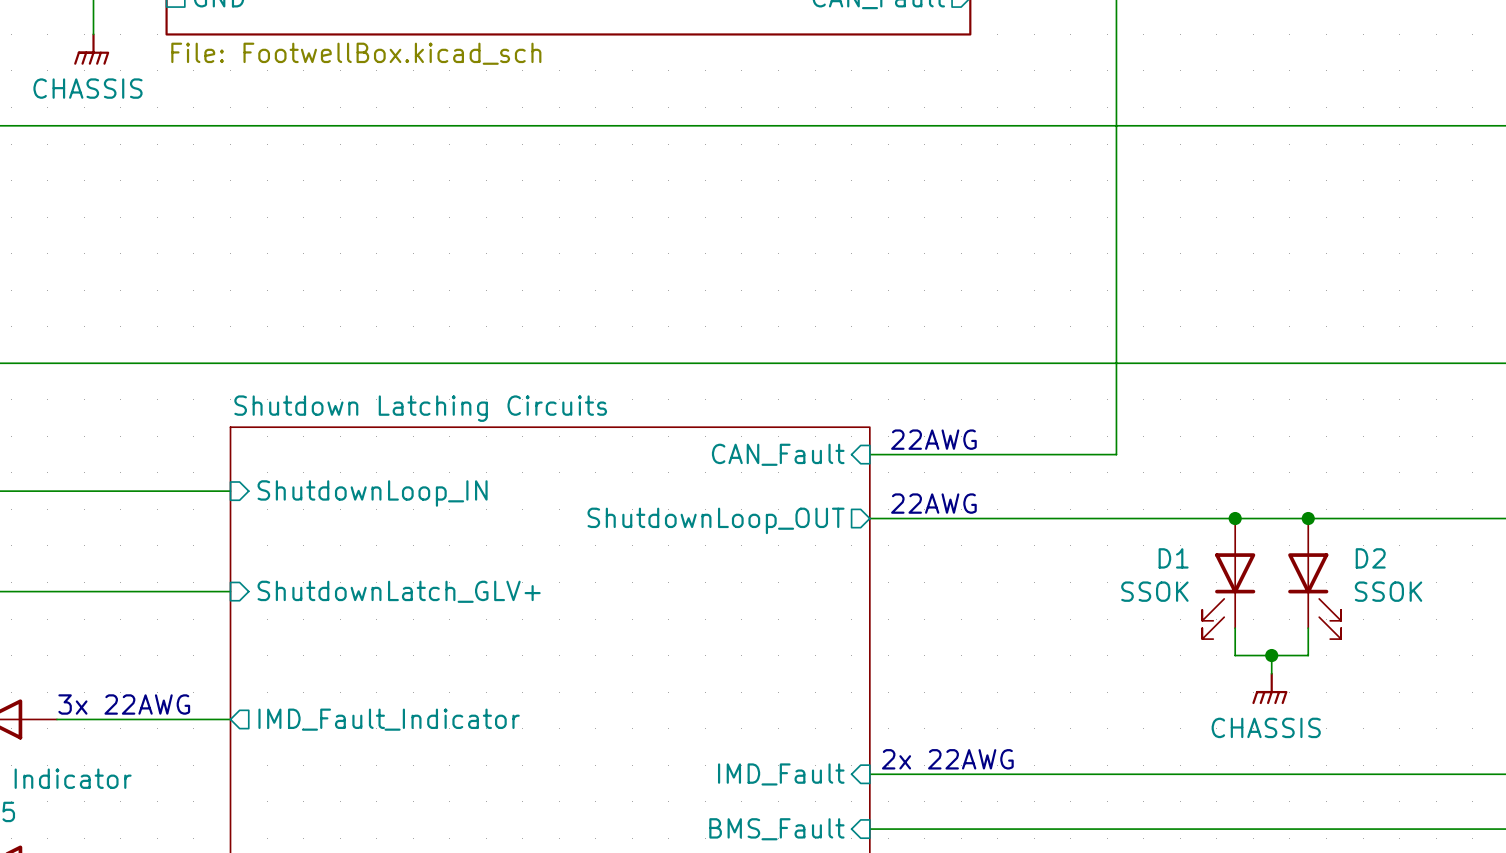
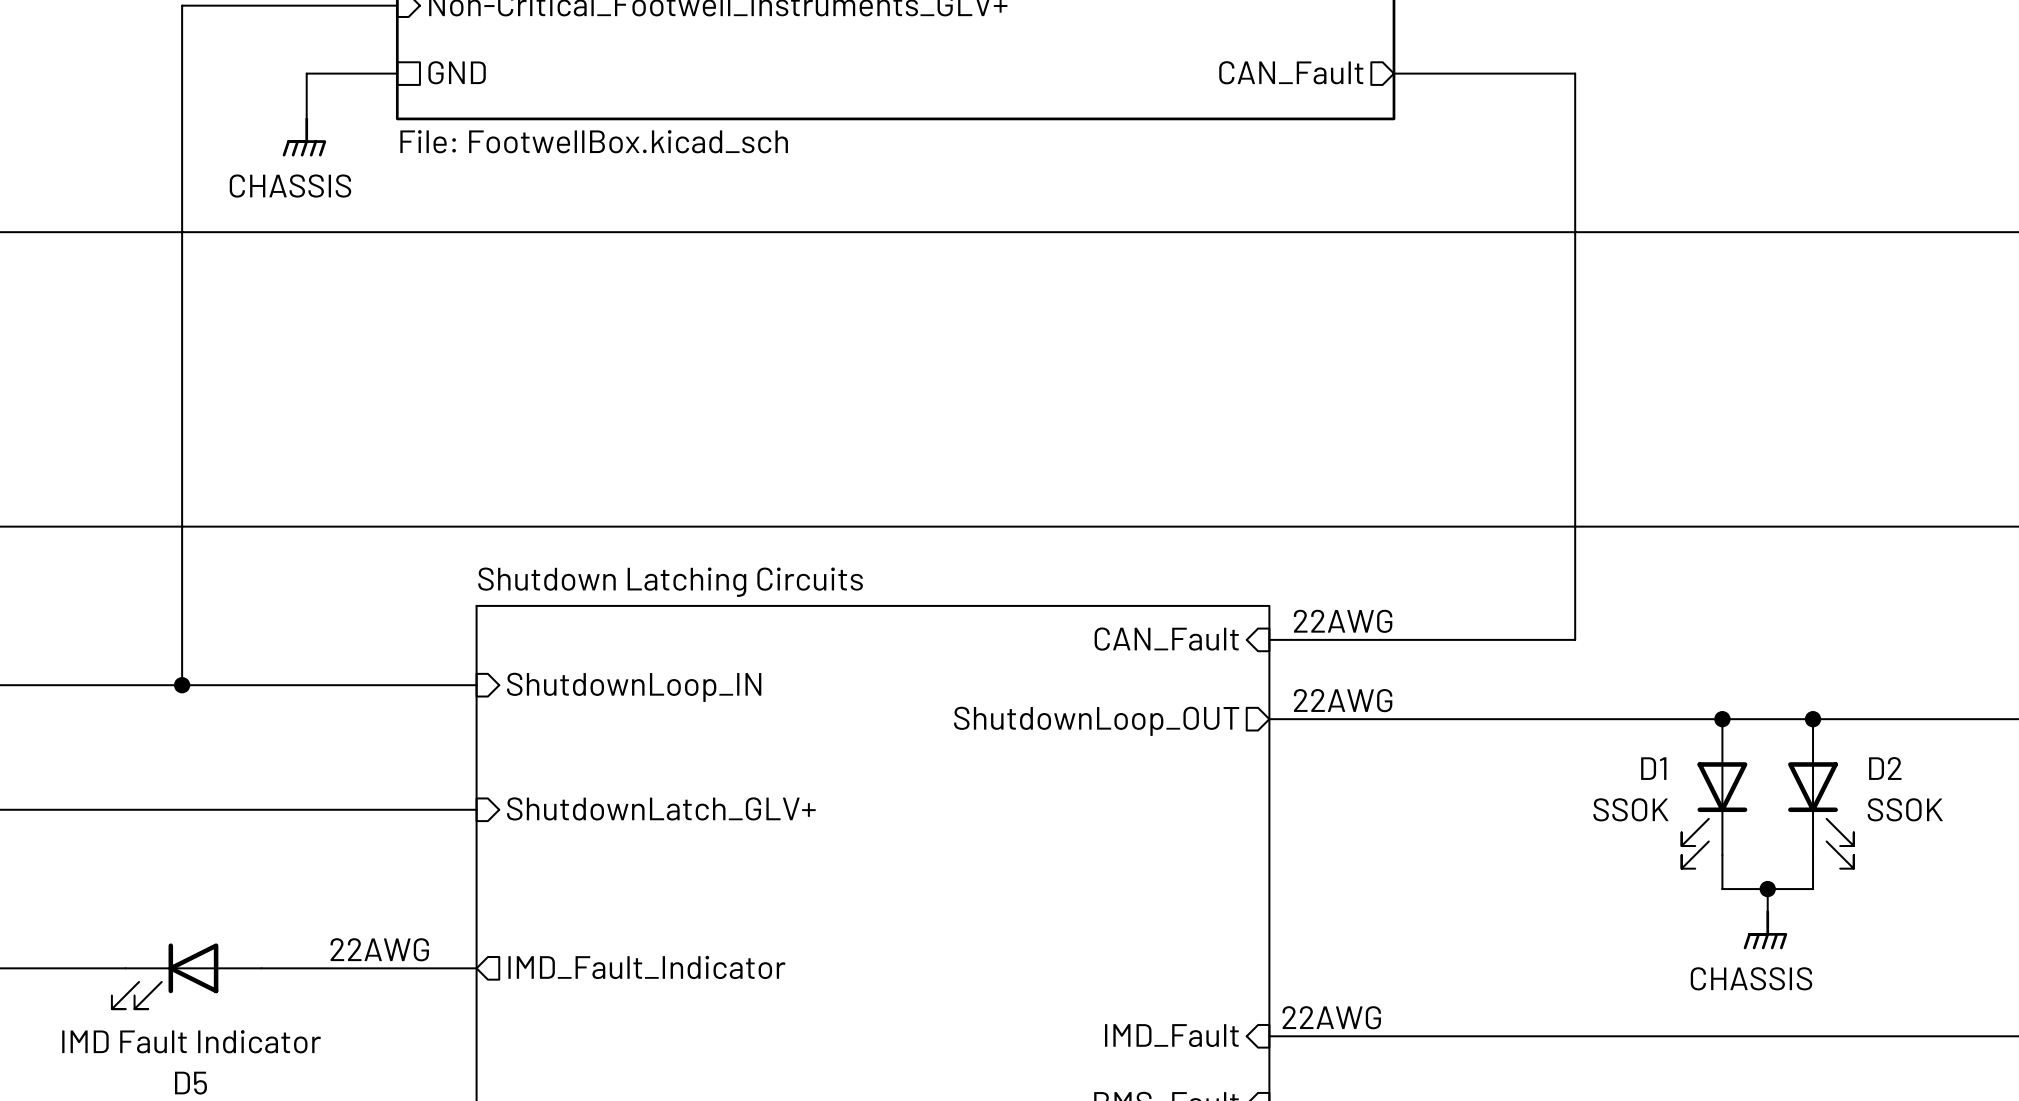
text: 3x 22AWG (124, 704) -> 22AWG (379, 949)
text: 2x 22AWG (947, 759) -> 22AWG (1331, 1017)

